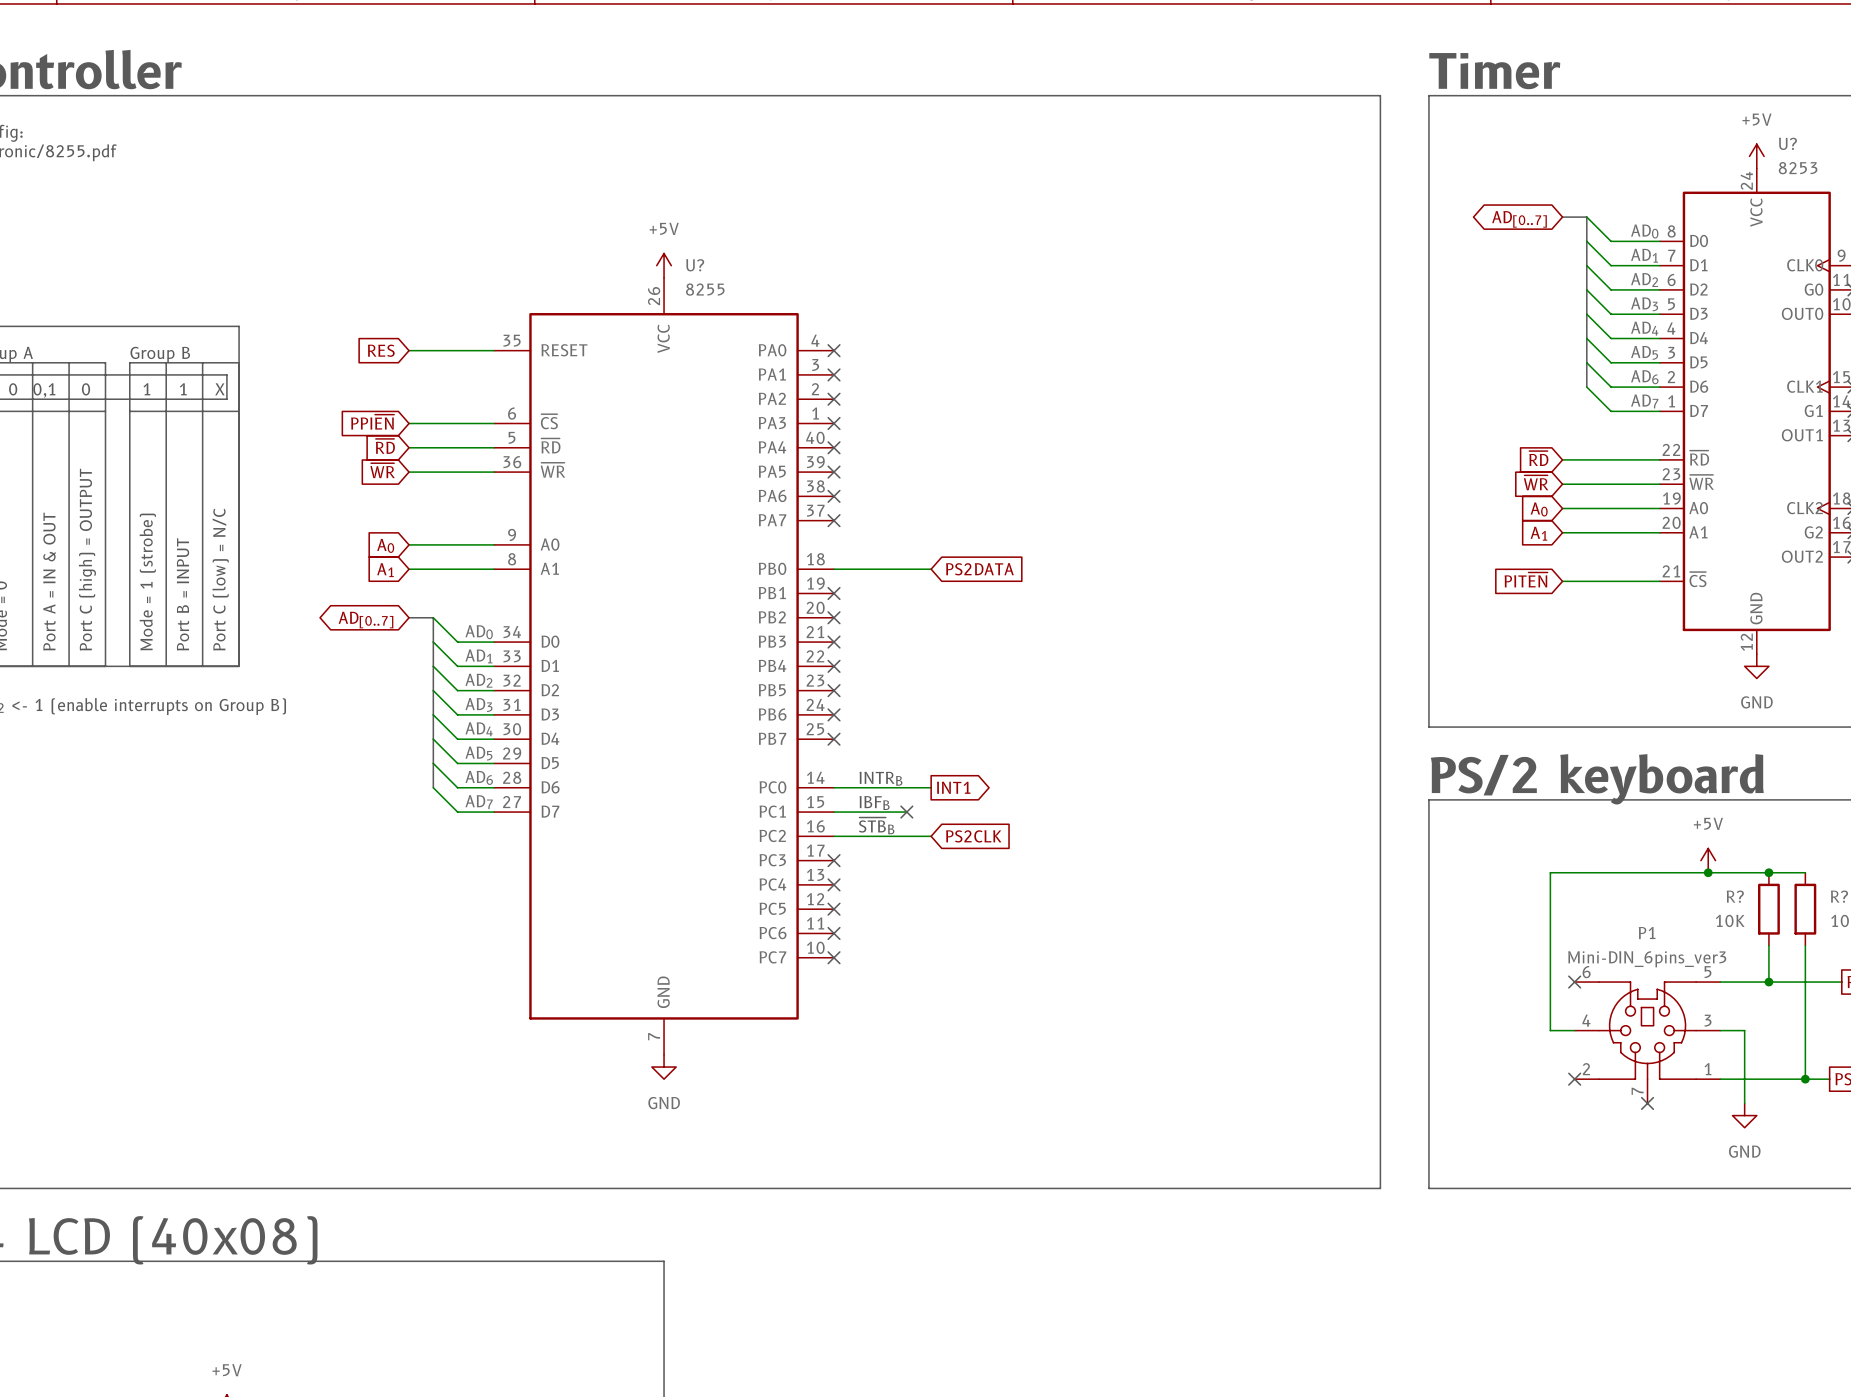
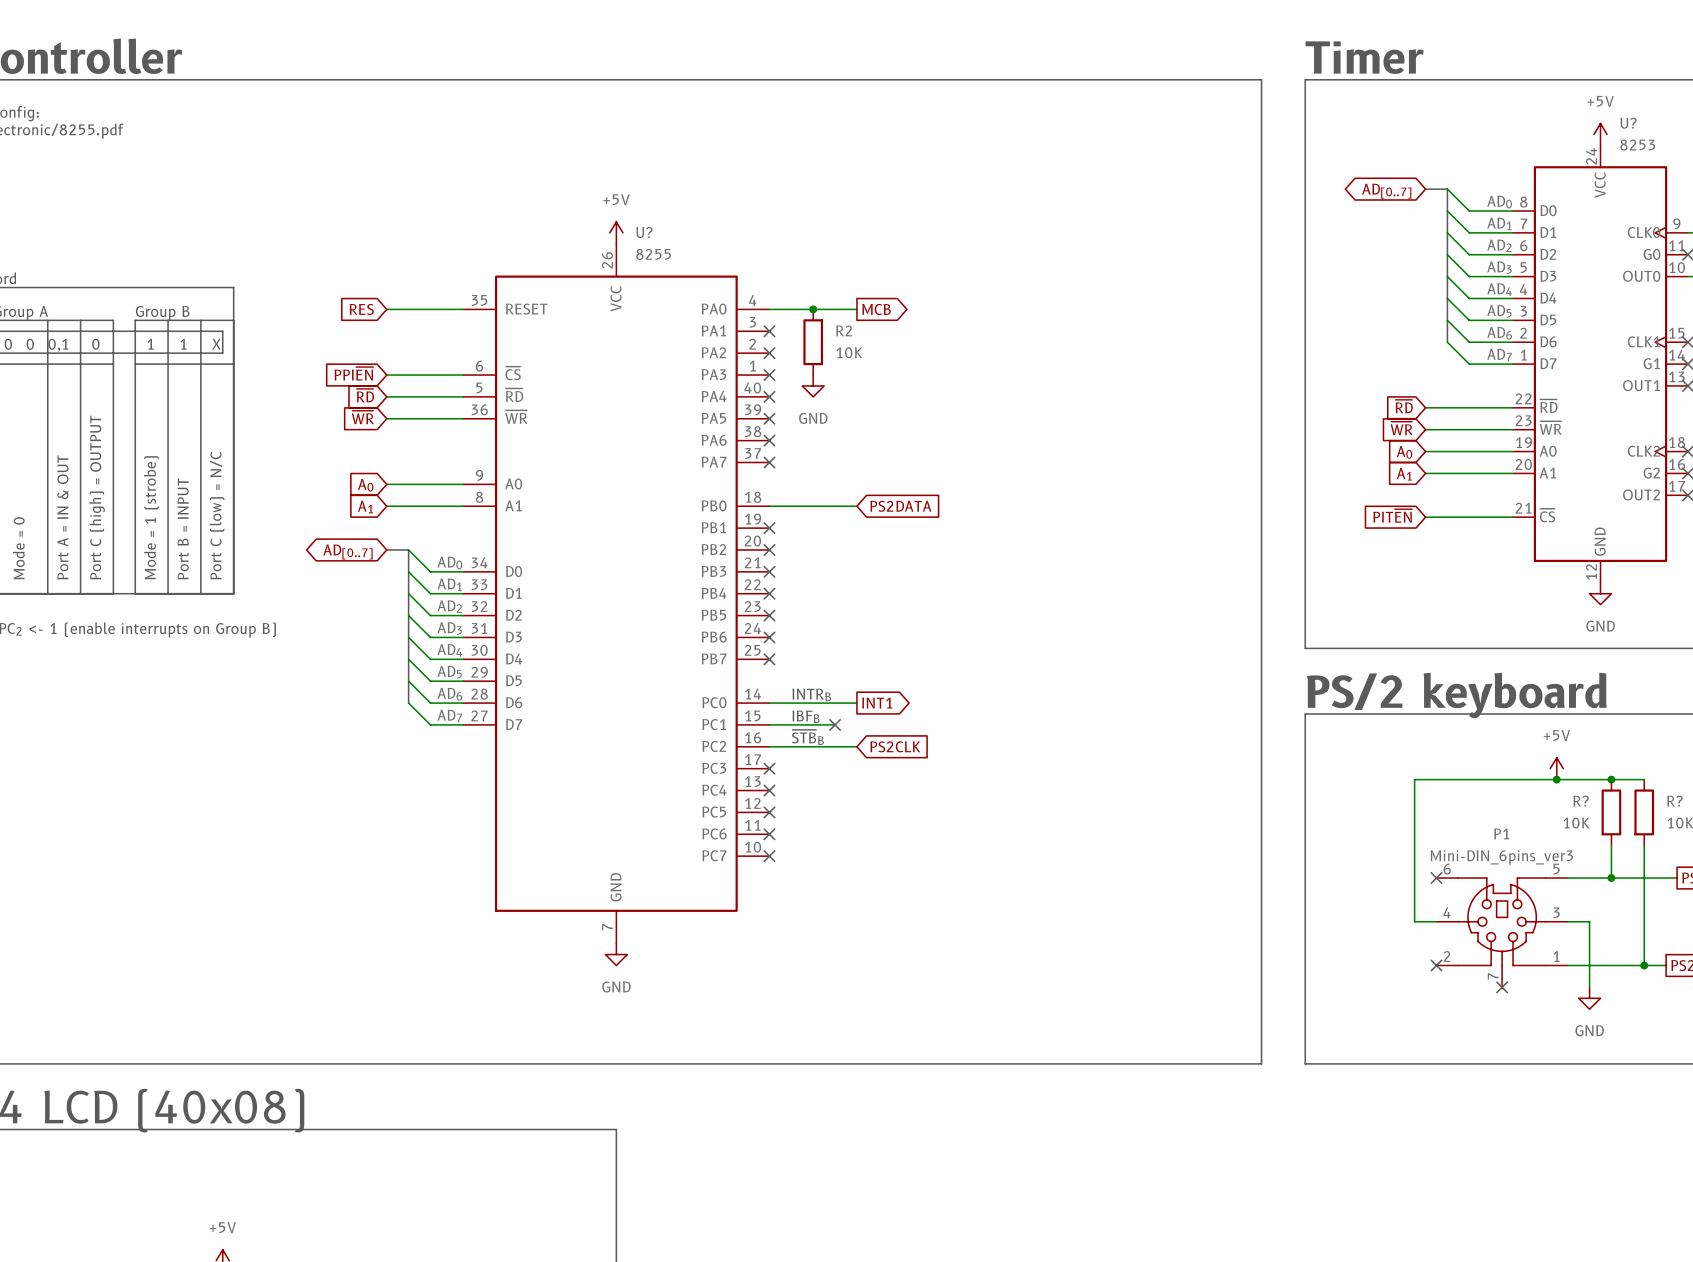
wire: none -> (769, 309) (856, 309)
no-connect mark: (834, 350) -> none
junction: none -> (813, 309)
global label: none -> MCB (876, 309)
R2: none -> 10K (813, 342)
power symbol: none -> GND (813, 385)

